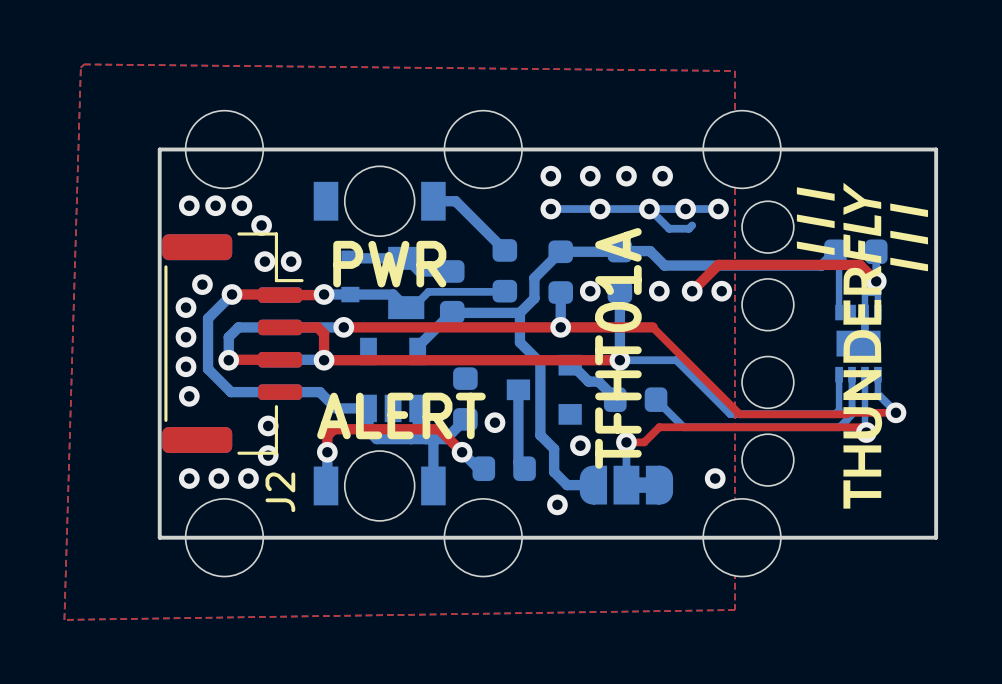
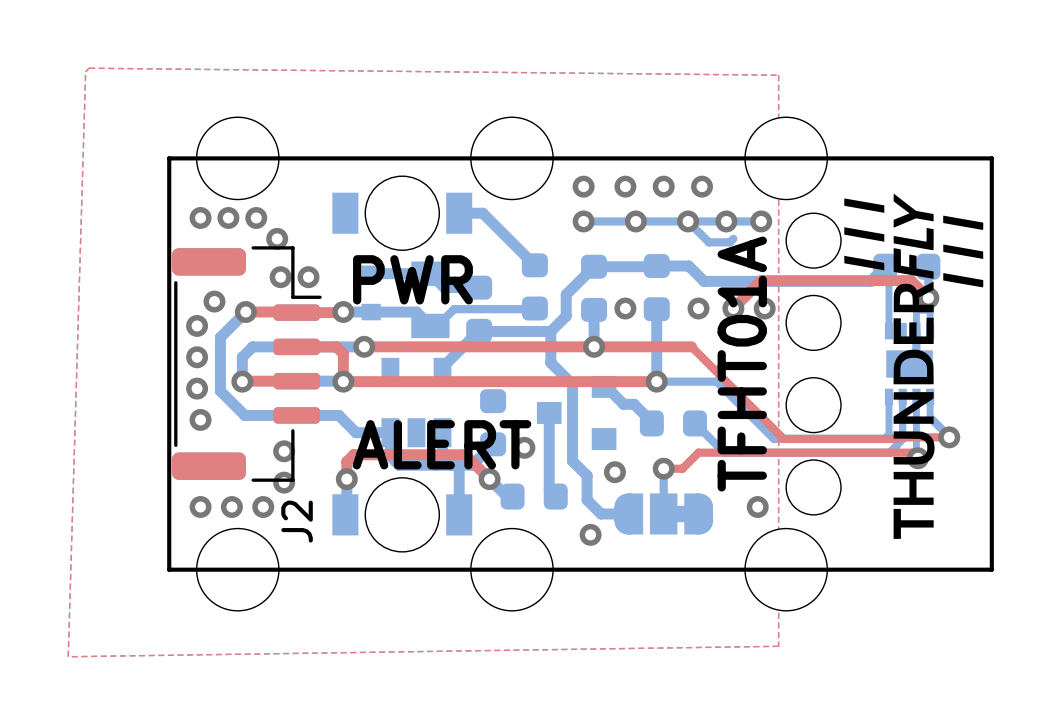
text position: TFHT01A (618, 348) -> TFHT01A (742, 364)
text position: ALERT (401, 415) -> ALERT (441, 444)

